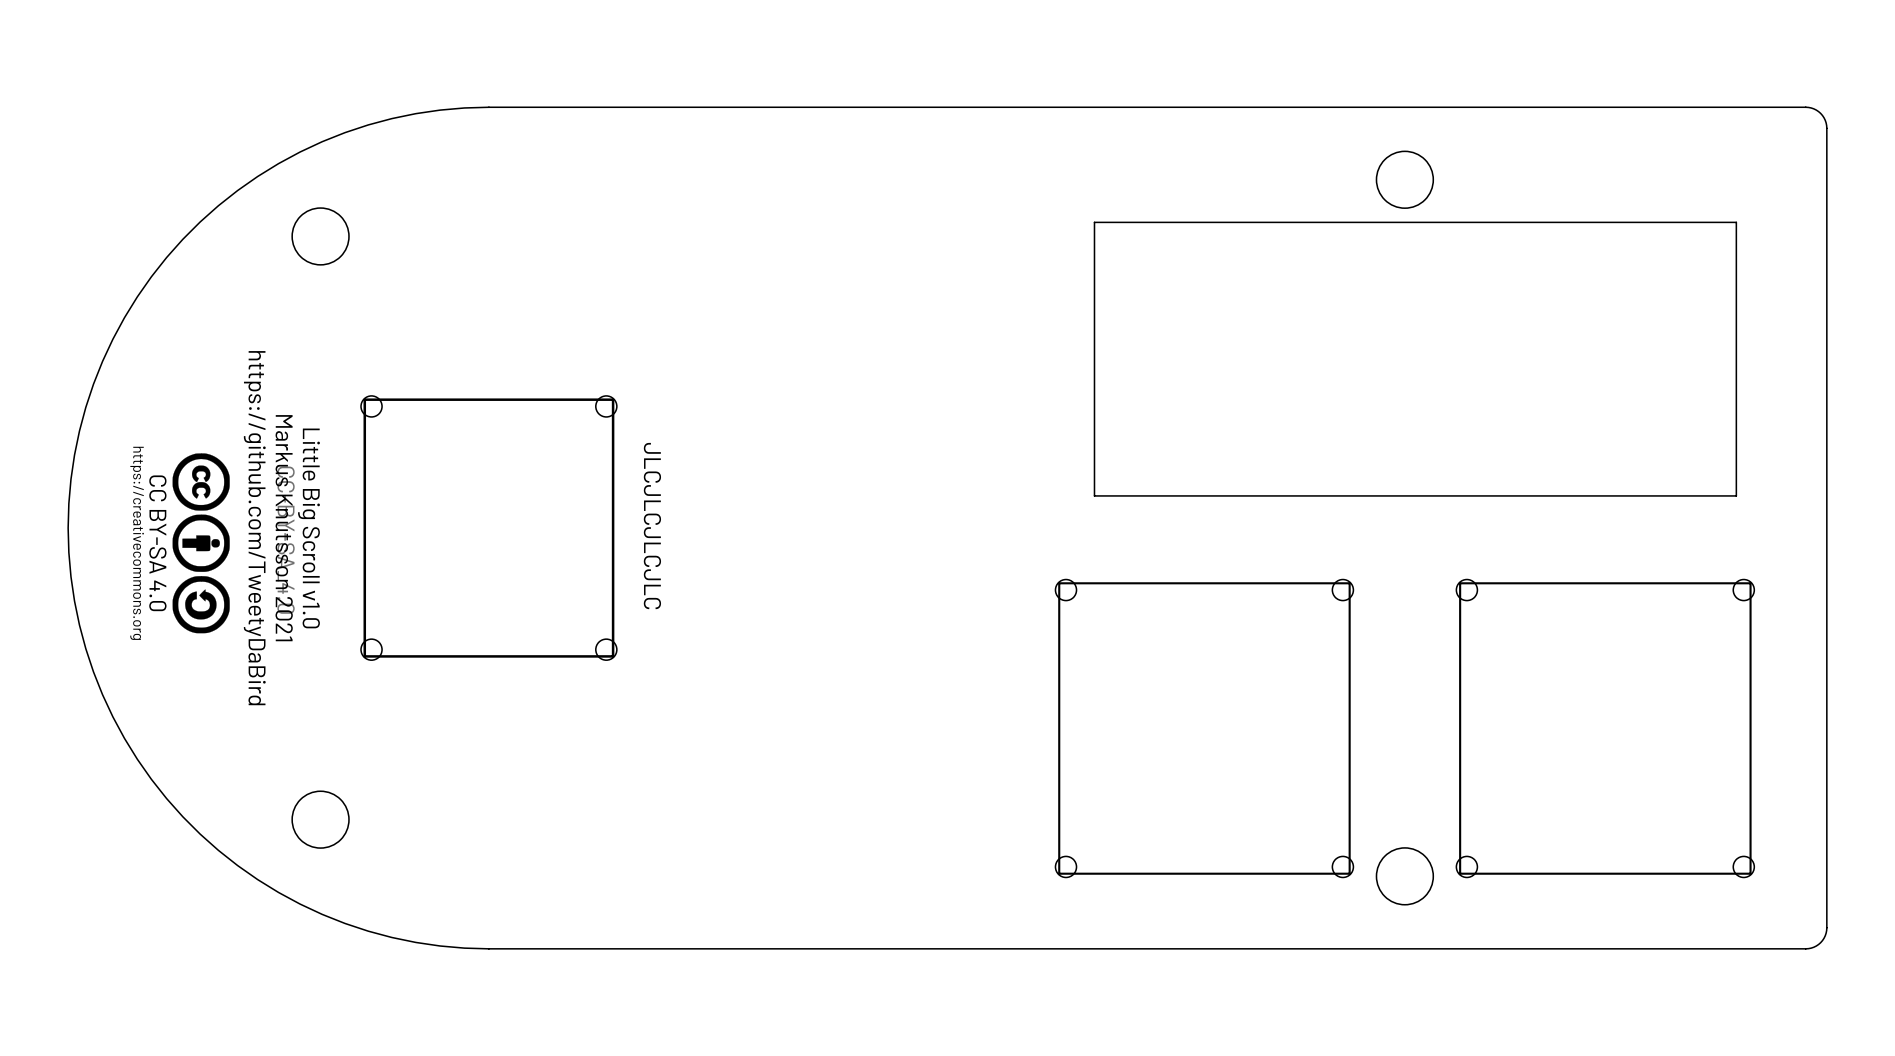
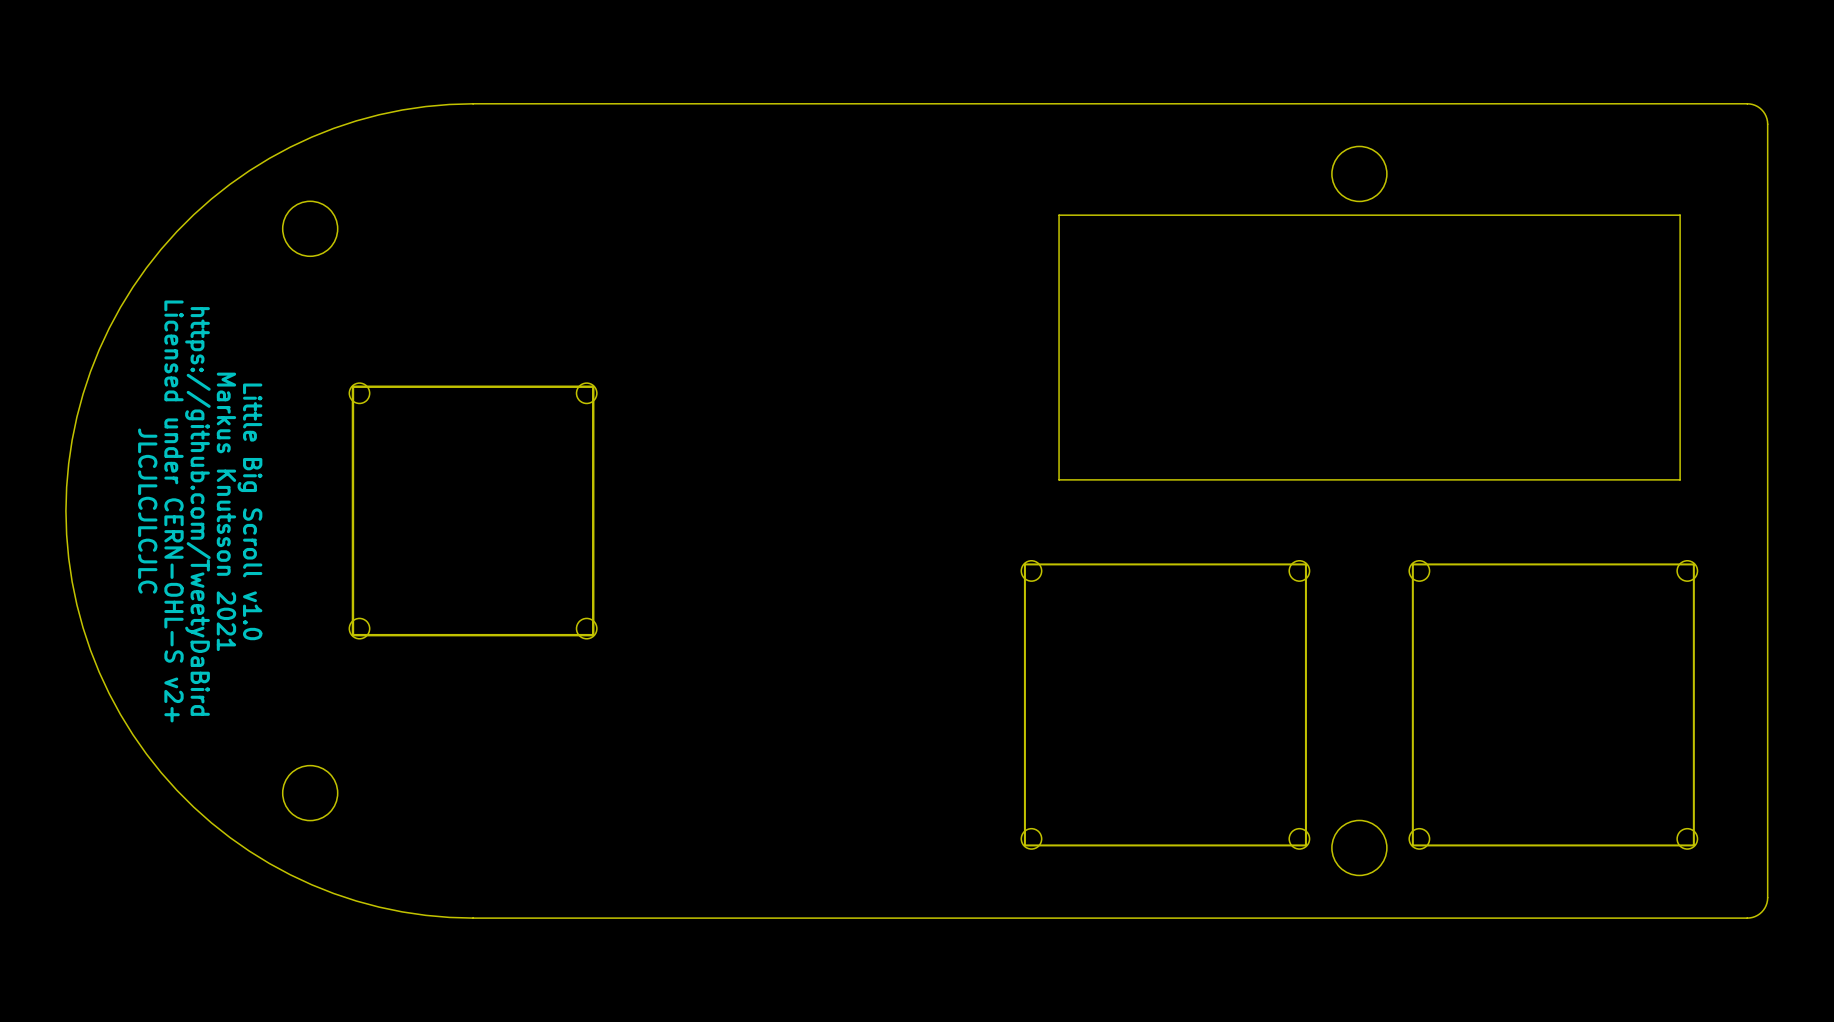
drawing: [172, 453, 230, 634] -> none
text position: JLCJLCJLCJLC (652, 526) -> JLCJLCJLCJLC (147, 511)
text: none -> https://github.com/TweetyDaBird (197, 511)
text: https://github.com/TweetyDaBird (254, 528) -> Little Big Scroll v1.0 (249, 511)
text position: Markus Knutsson 2021 (284, 528) -> Markus Knutsson 2021 (226, 511)
text: Little Big Scroll v1.0 (308, 528) -> none
text: none -> Licensed under CERN-OHL-S v2+ (174, 511)

